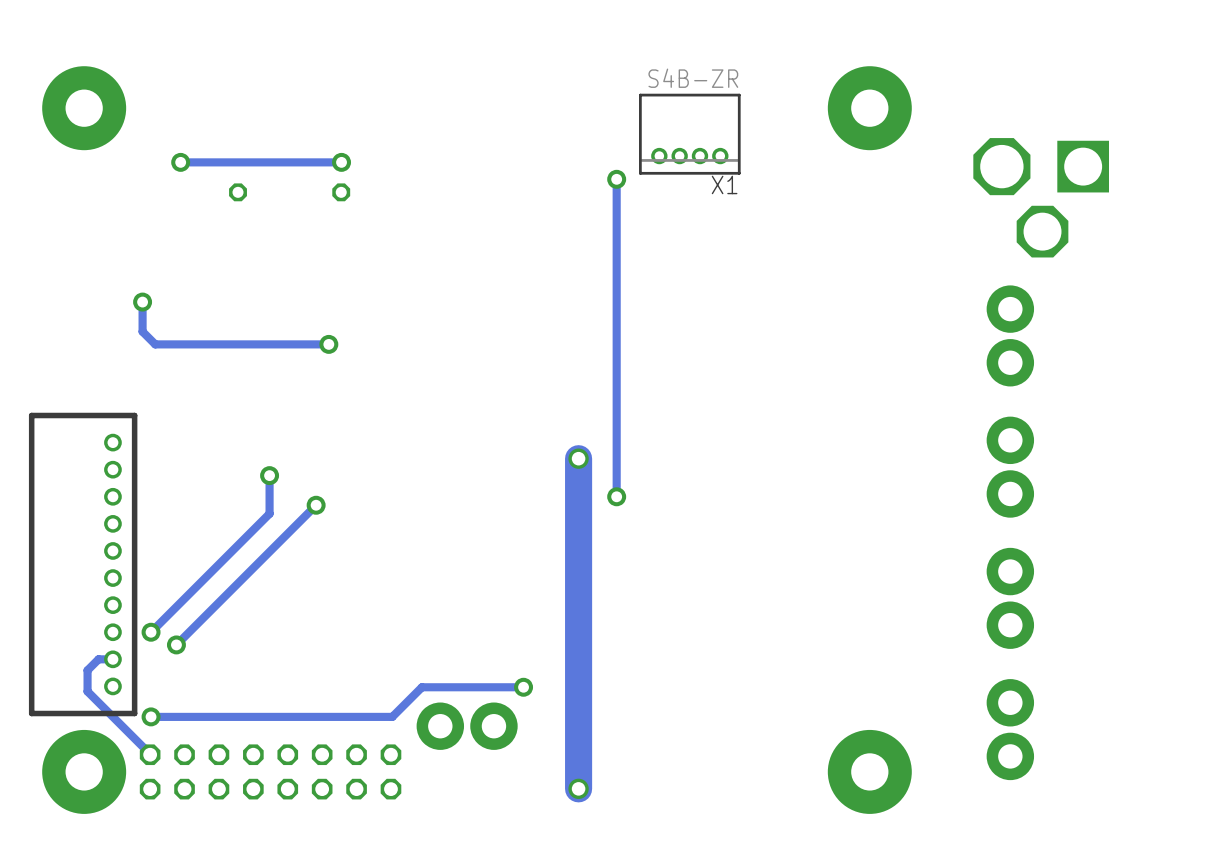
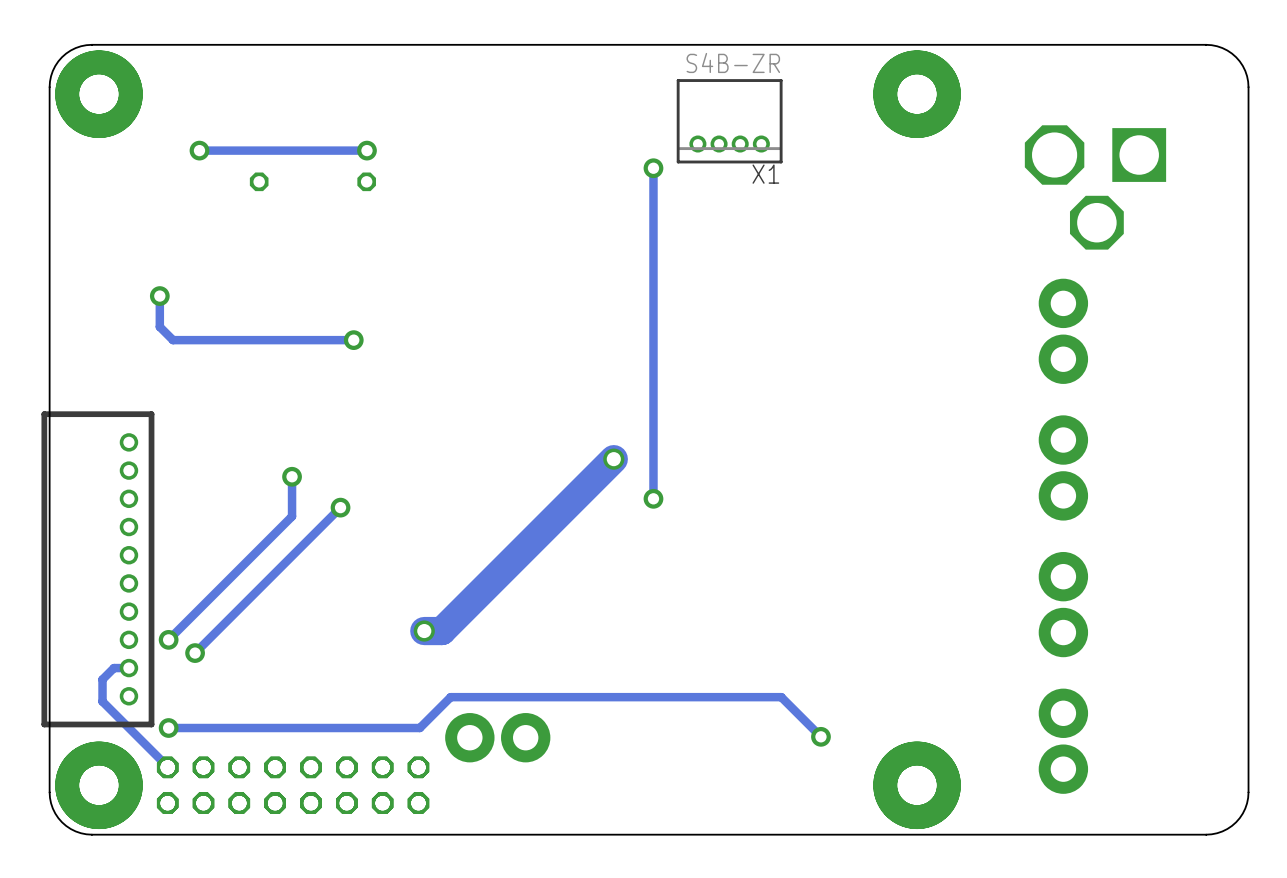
part: none -> (649, 439)
track: (578, 458) (578, 788) -> (613, 459) (441, 631) (424, 631)
via: none -> (424, 631)
track: none -> (556, 697) (781, 697) (820, 736)
via: (523, 687) -> none
via: none -> (820, 736)
via: (578, 788) -> none

